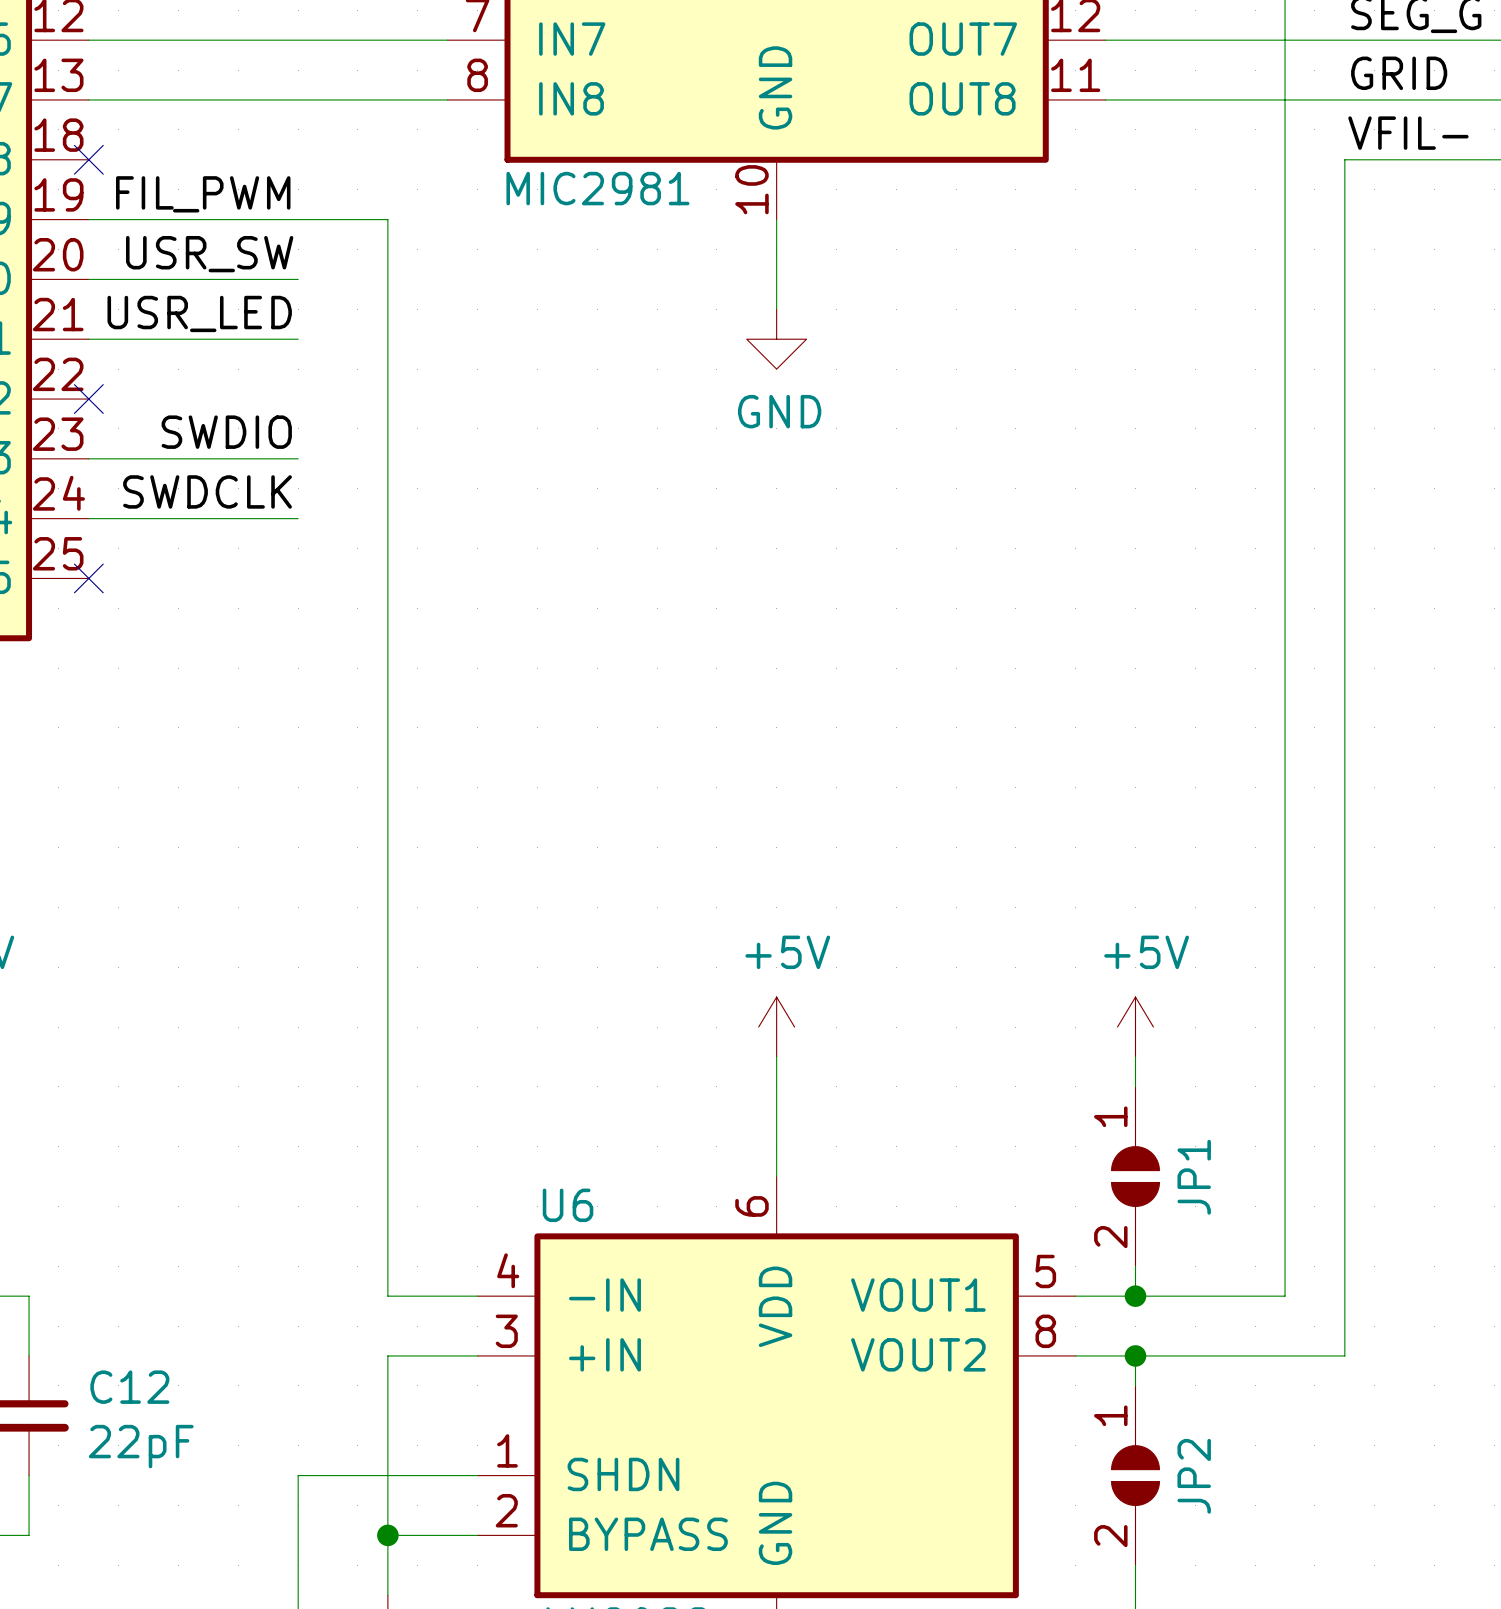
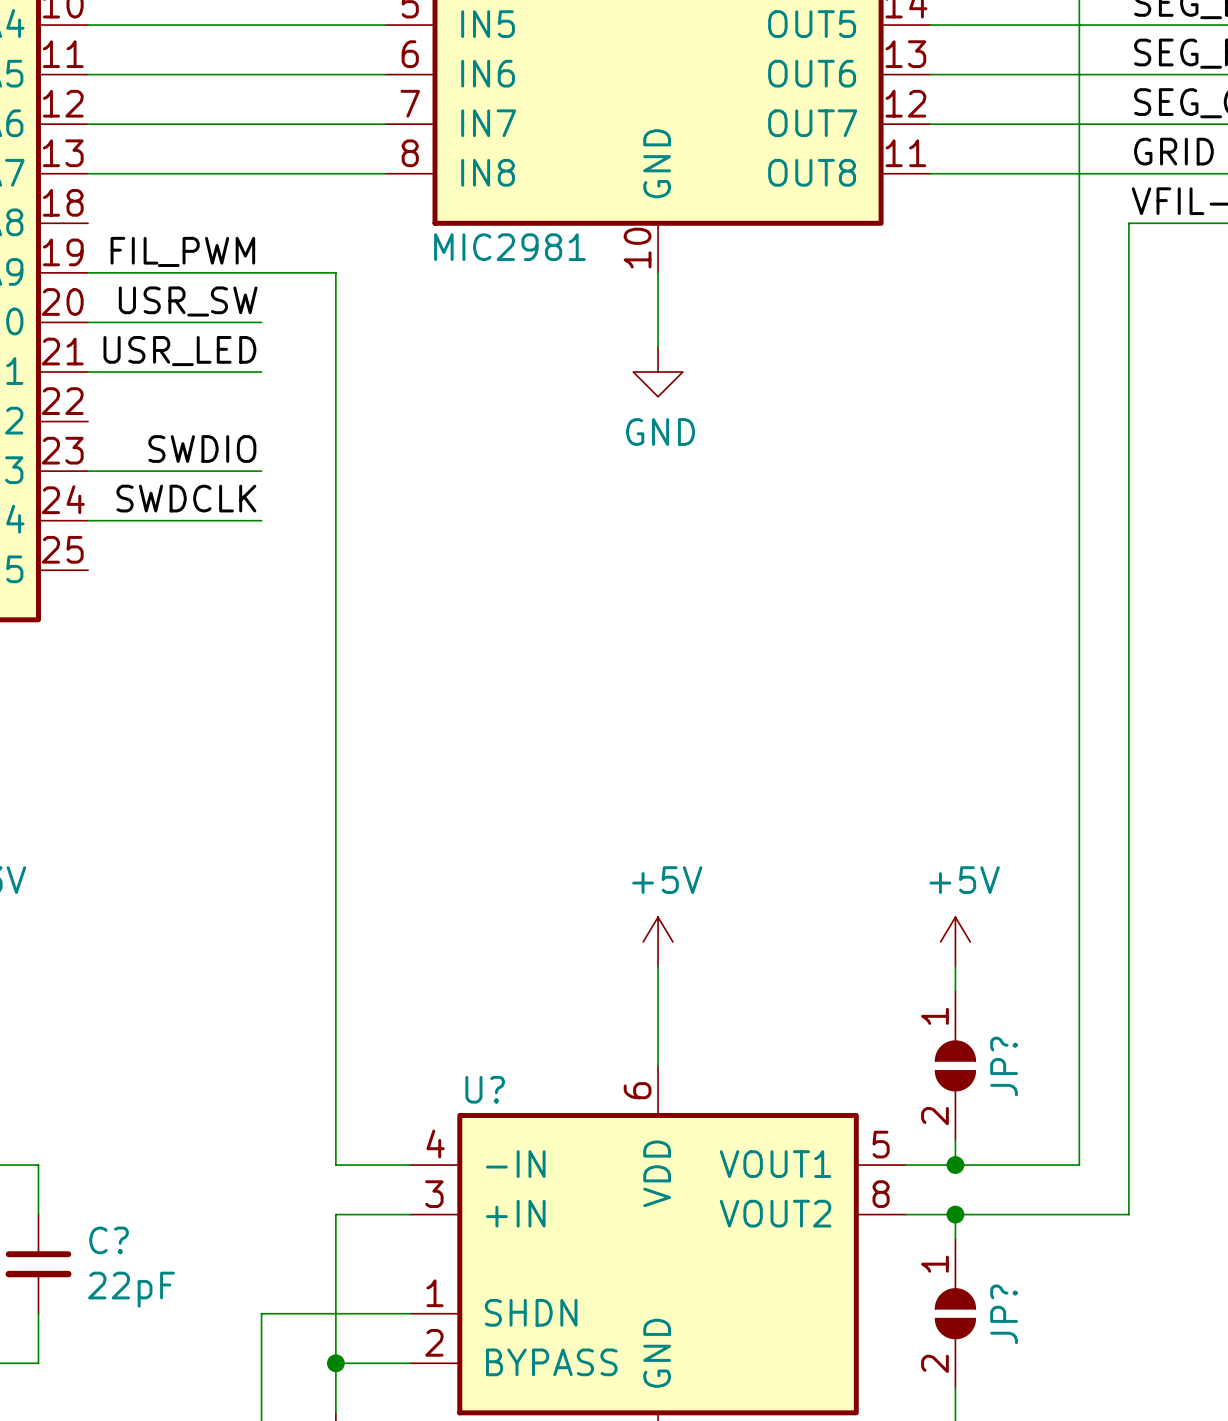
no-connect mark: (88, 159) -> none
no-connect mark: (88, 399) -> none
no-connect mark: (88, 578) -> none
JP1 name: JP1 (1194, 1177) -> JP? (1004, 1066)
U6 name: U6 (568, 1205) -> U? (485, 1089)
C12 name: C12 (129, 1387) -> C? (109, 1240)
JP2 name: JP2 (1194, 1476) -> JP? (1004, 1314)

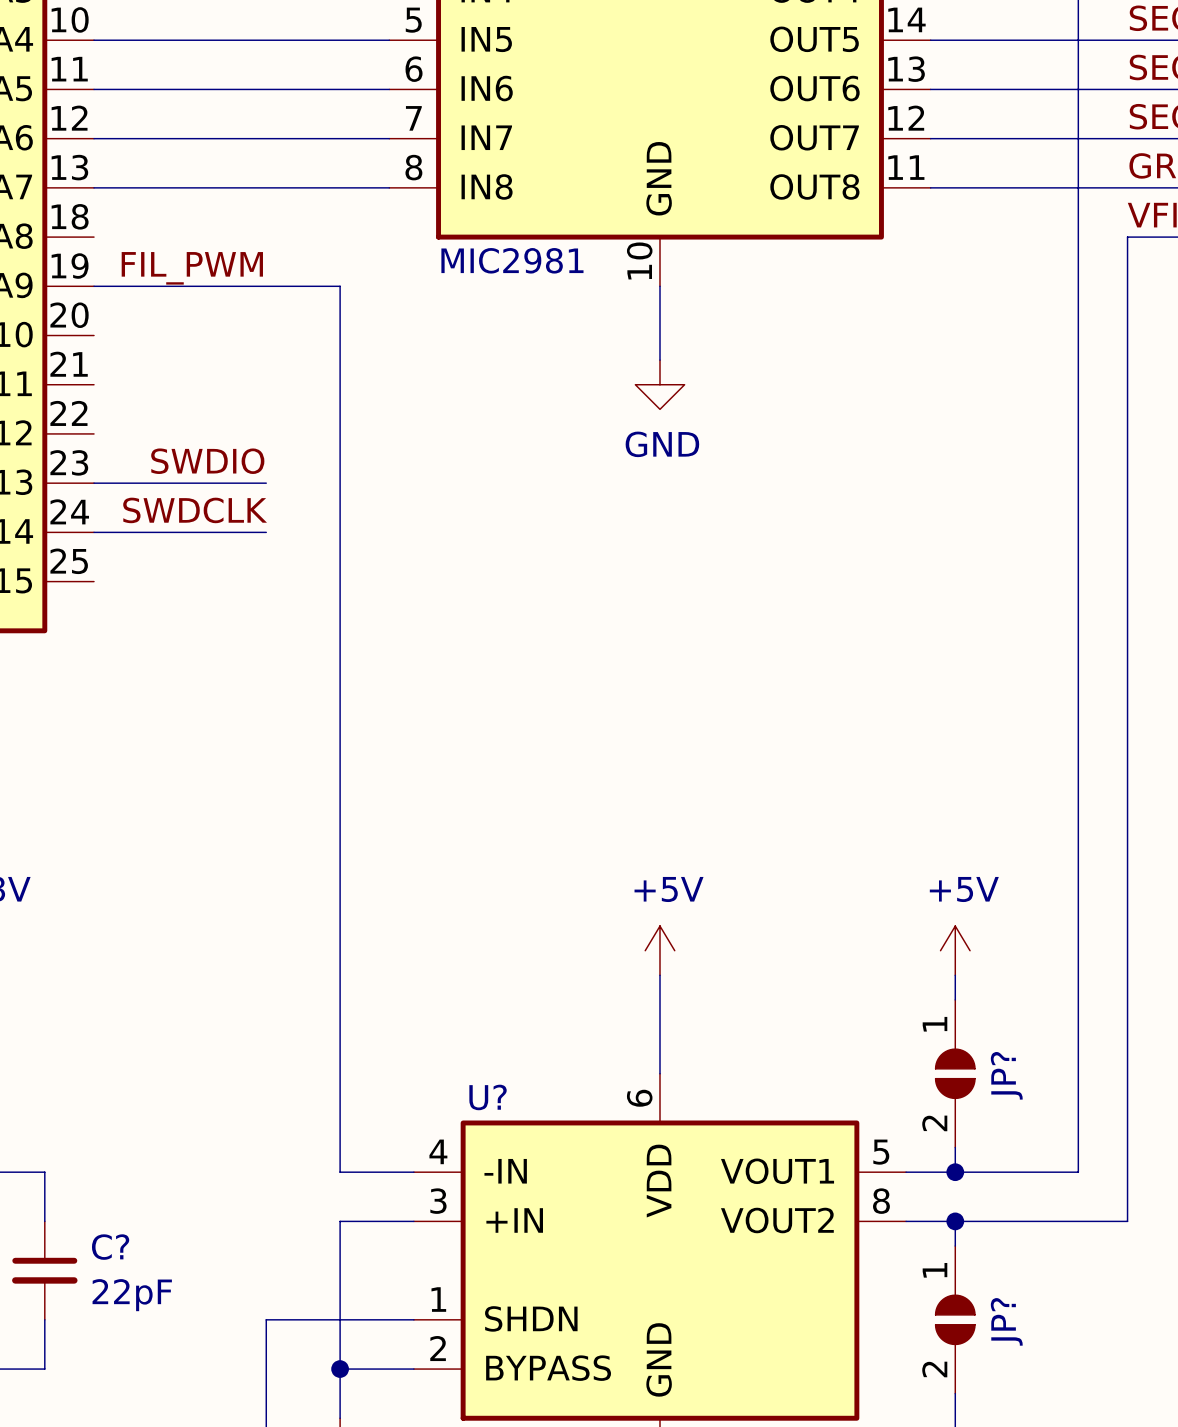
label: USR_SW (188, 301) -> none
wire: (88, 322) (261, 322) -> none
label: USR_LED (179, 351) -> none
wire: (88, 371) (261, 371) -> none

